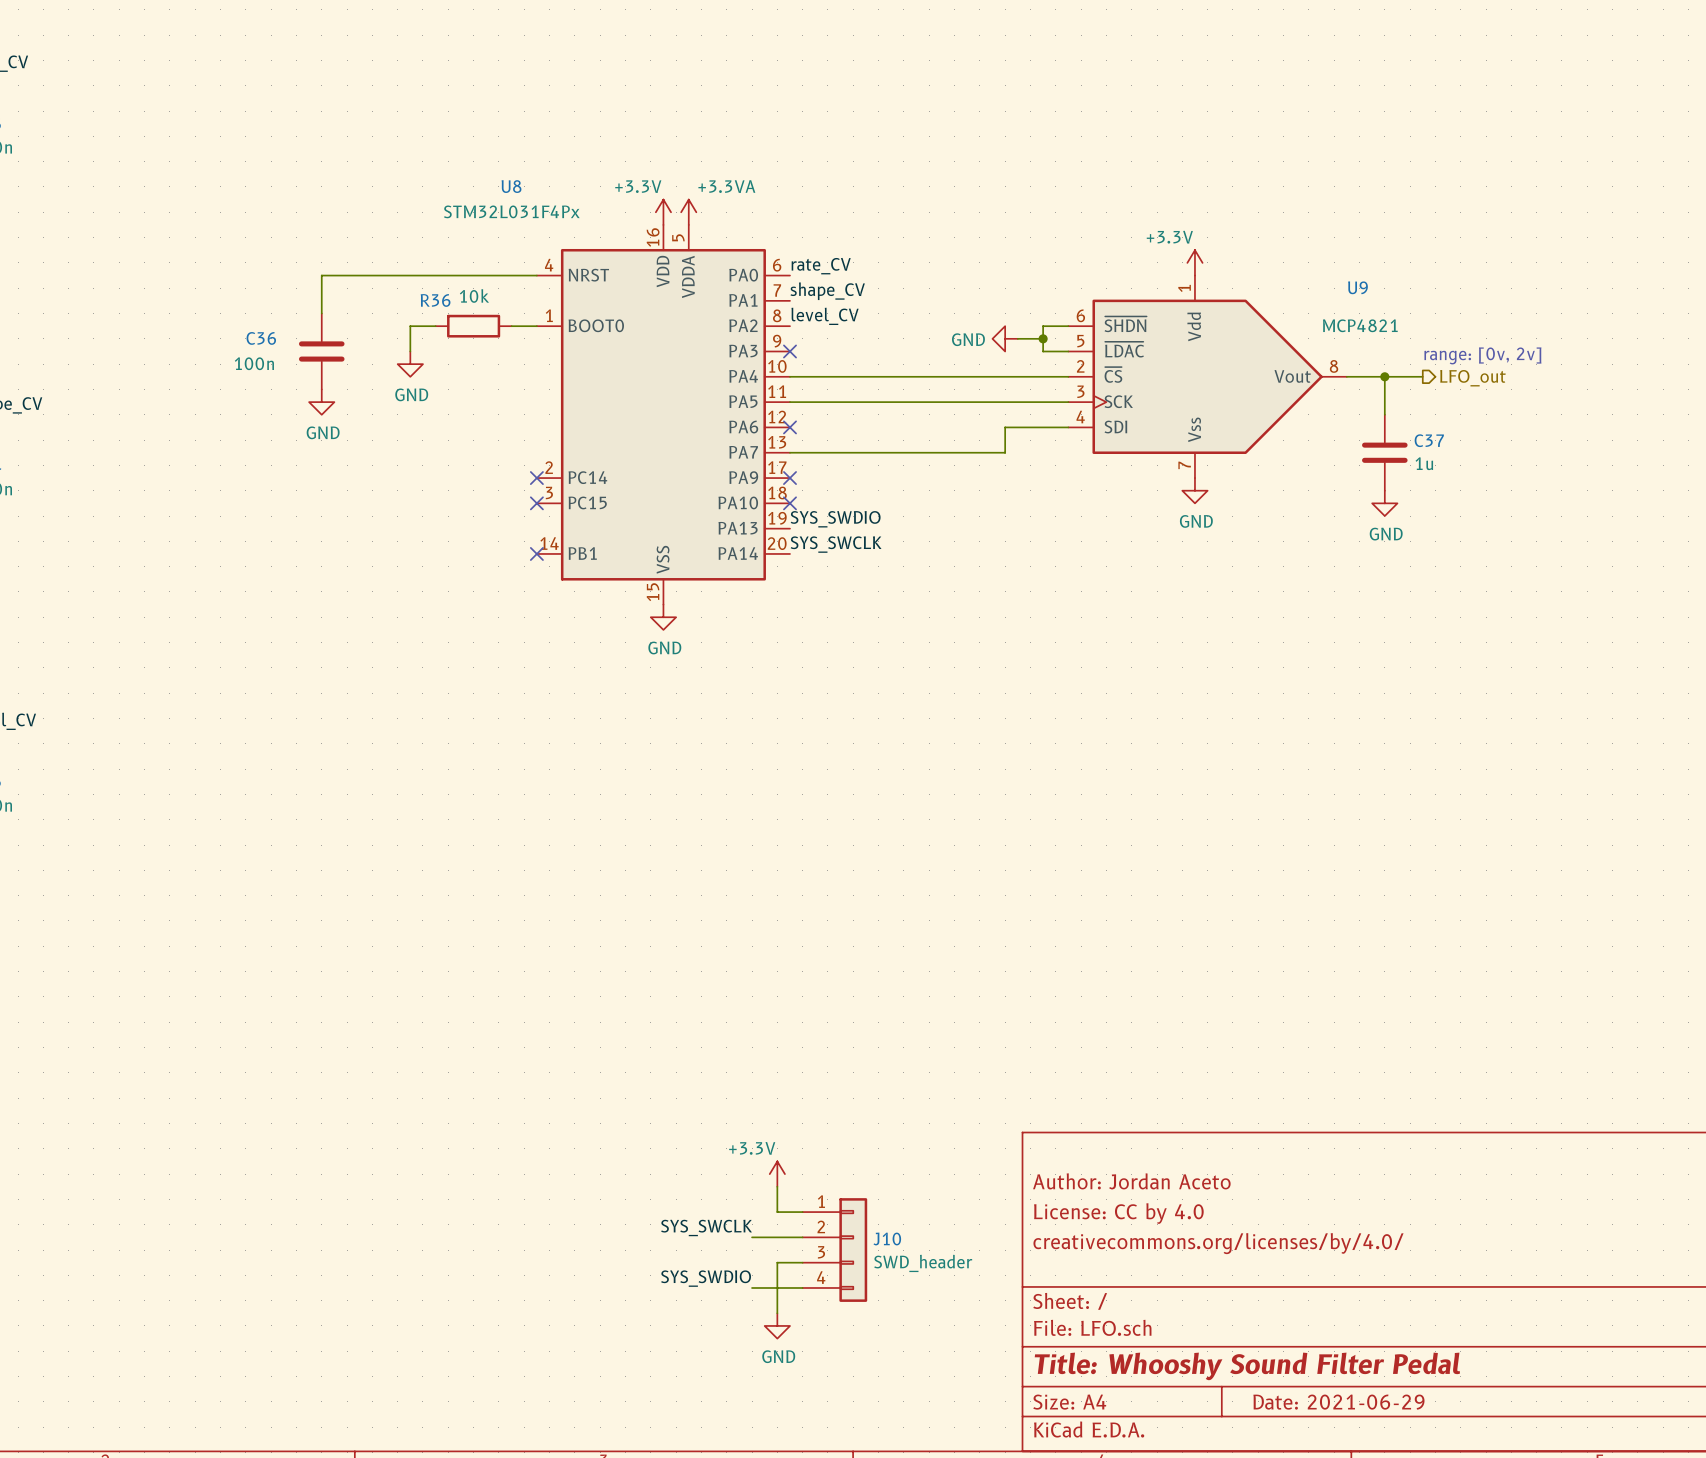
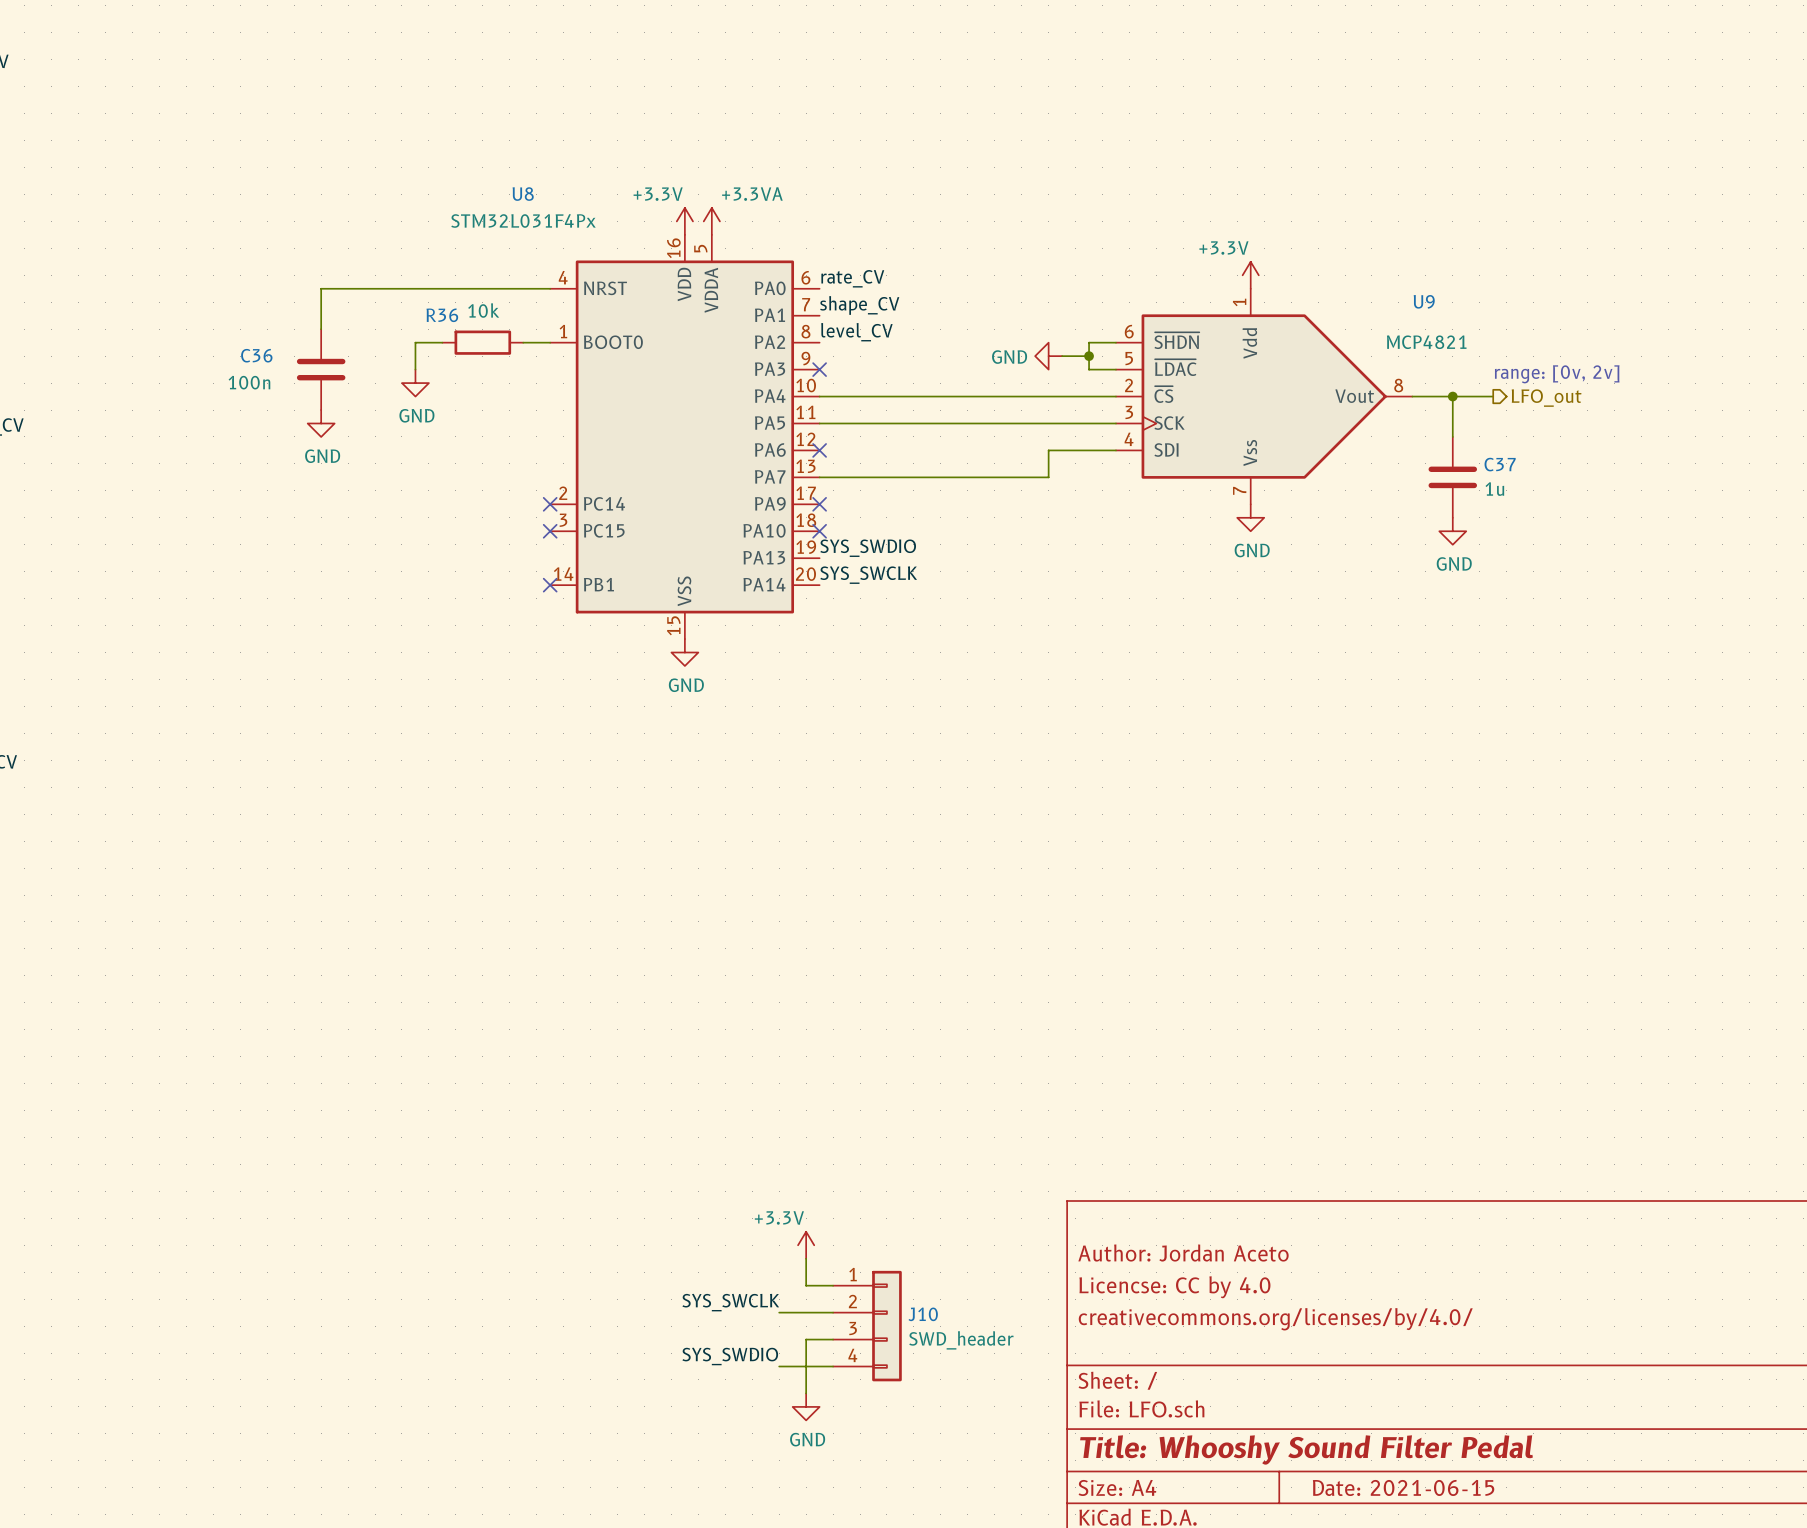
title block: License: CC by 4.0 (1118, 1213) -> Licencse: CC by 4.0 (1174, 1287)
title block: Date: 2021-06-29 (1338, 1402) -> Date: 2021-06-15 (1403, 1487)

